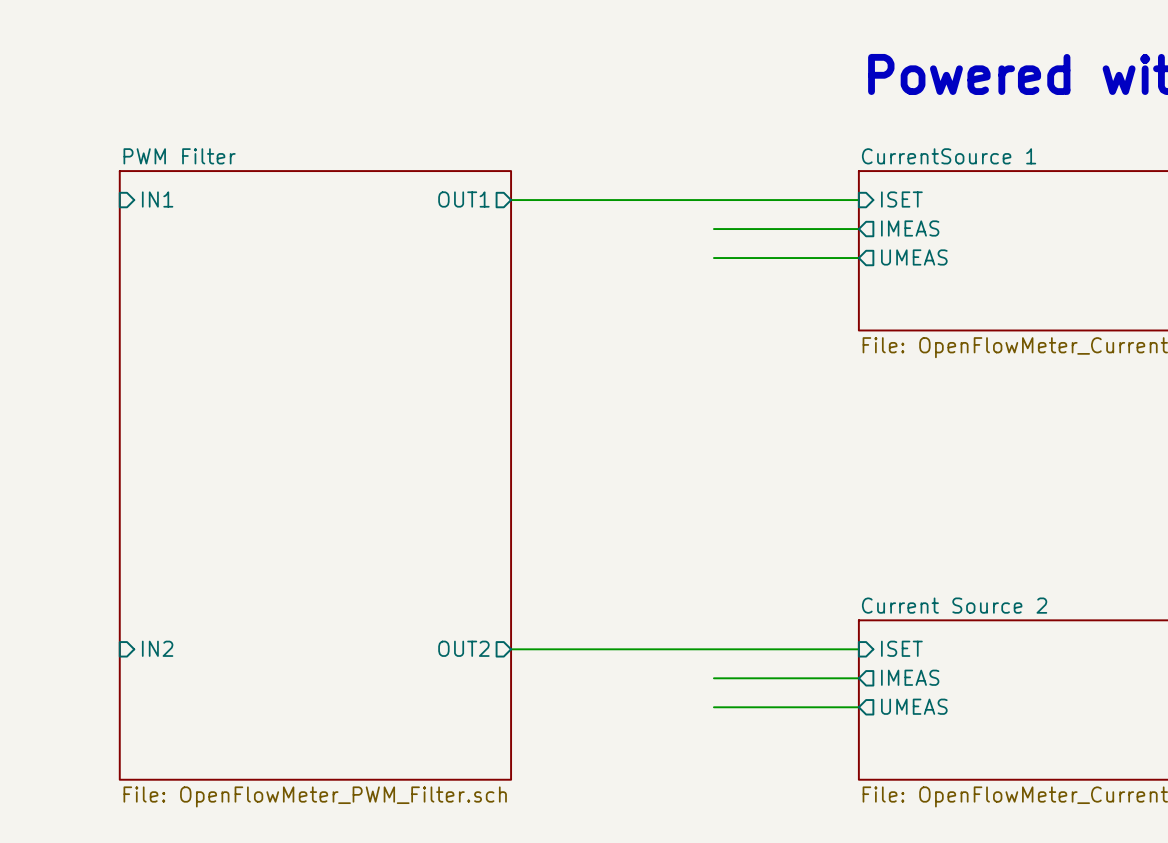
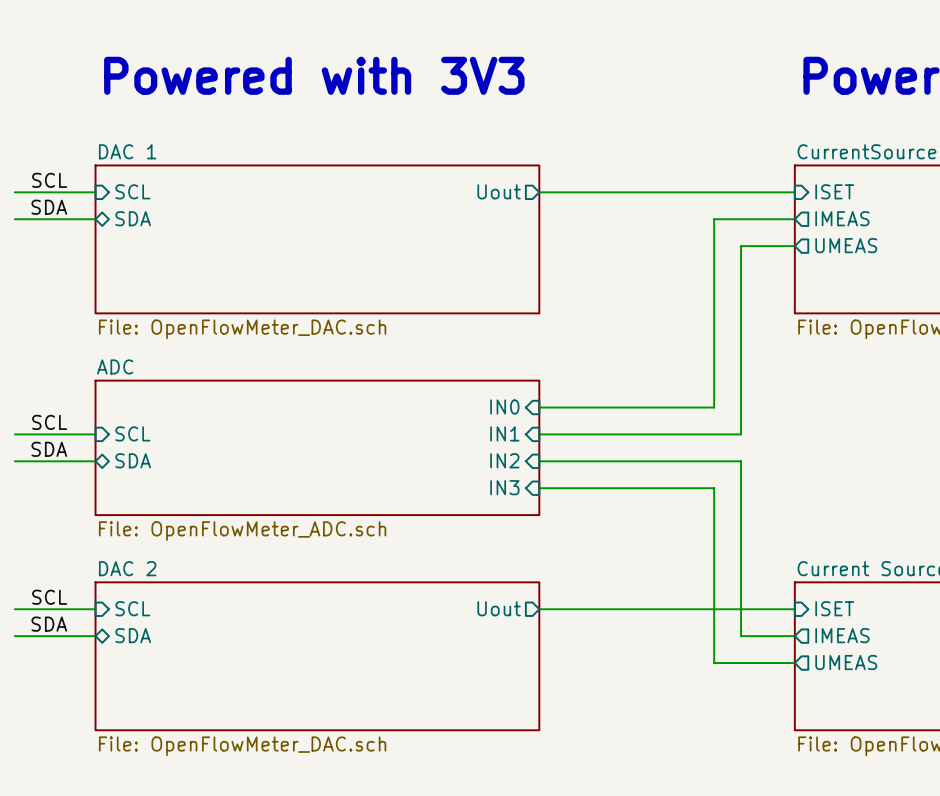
text: none -> Powered with 3V3 (314, 75)
label: none -> SCL (49, 180)
sheet pin: none -> SCL (132, 191)
sheet pin: IN1 (157, 199) -> none
sheet pin: OUT1 (463, 199) -> none
sheet pin: none -> Uout (499, 191)
wire: none -> (14, 192) (95, 192)
wire: (511, 200) (583, 200) -> none
label: none -> SDA (49, 207)
sheet pin: none -> SDA (133, 218)
wire: none -> (14, 219) (95, 219)
wire: (713, 229) (771, 229) -> (539, 407) (714, 407) (714, 219)
sheet DAC 1: none -> File: OpenFlowMeter_DAC.sch (317, 239)
wire: (713, 258) (800, 258) -> (539, 434) (741, 434) (741, 246)
sheet pin: none -> IN0 (504, 407)
label: none -> SCL (49, 422)
wire: none -> (14, 434) (95, 434)
sheet pin: none -> SCL (132, 433)
sheet pin: none -> IN1 (504, 433)
sheet PWM Filter: File: OpenFlowMeter_PWM_Filter.sch (315, 475) -> none
sheet ADC: none -> File: OpenFlowMeter_ADC.sch (317, 447)
label: none -> SDA (49, 449)
wire: none -> (14, 461) (95, 461)
sheet pin: none -> SDA (133, 460)
sheet pin: none -> IN2 (504, 460)
sheet pin: none -> IN3 (504, 487)
label: none -> SCL (49, 597)
sheet pin: none -> SCL (132, 608)
sheet pin: IN2 (157, 648) -> none
sheet pin: OUT2 (463, 648) -> none
sheet pin: none -> Uout (499, 608)
wire: none -> (14, 609) (95, 609)
wire: (511, 649) (583, 649) -> none
label: none -> SDA (49, 624)
sheet pin: none -> SDA (133, 635)
wire: none -> (14, 636) (95, 636)
wire: (713, 678) (800, 678) -> (539, 461) (741, 461) (741, 636)
sheet DAC 2: none -> File: OpenFlowMeter_DAC.sch (317, 656)
wire: (713, 707) (771, 707) -> (539, 488) (714, 488) (714, 663)

